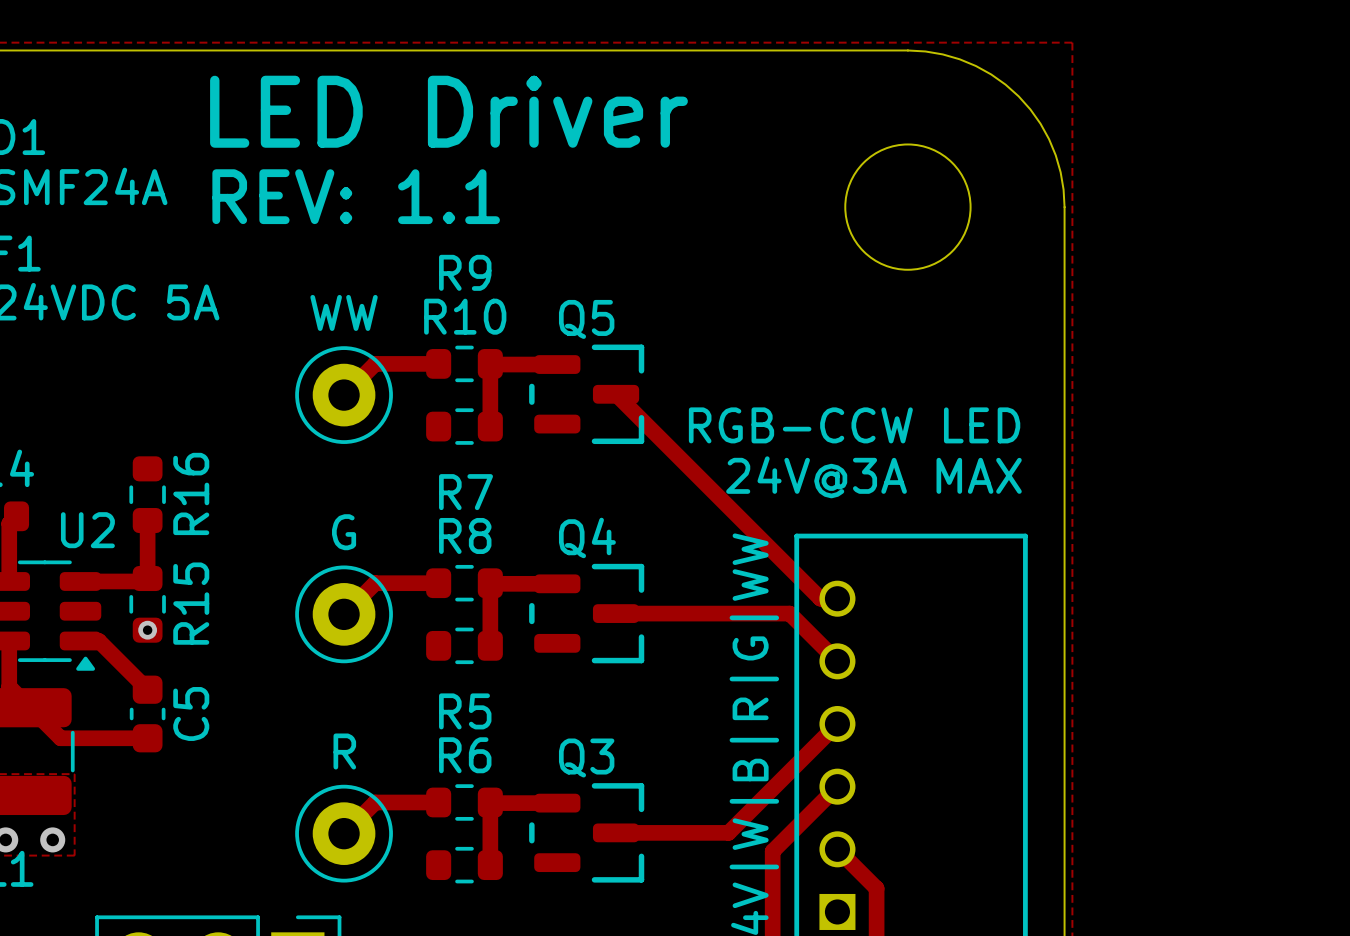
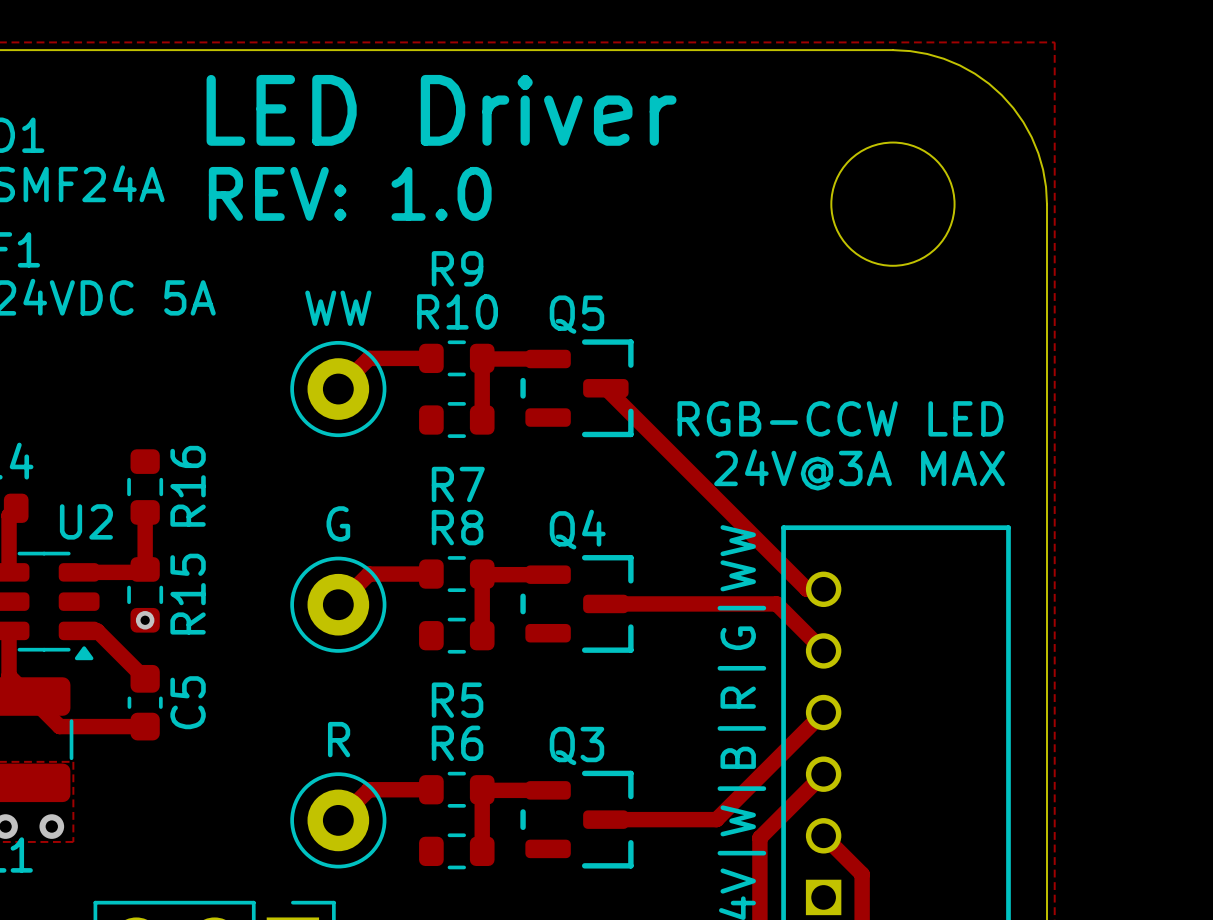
text: REV: 1.1 (356, 196) -> REV: 1.0 (350, 193)

